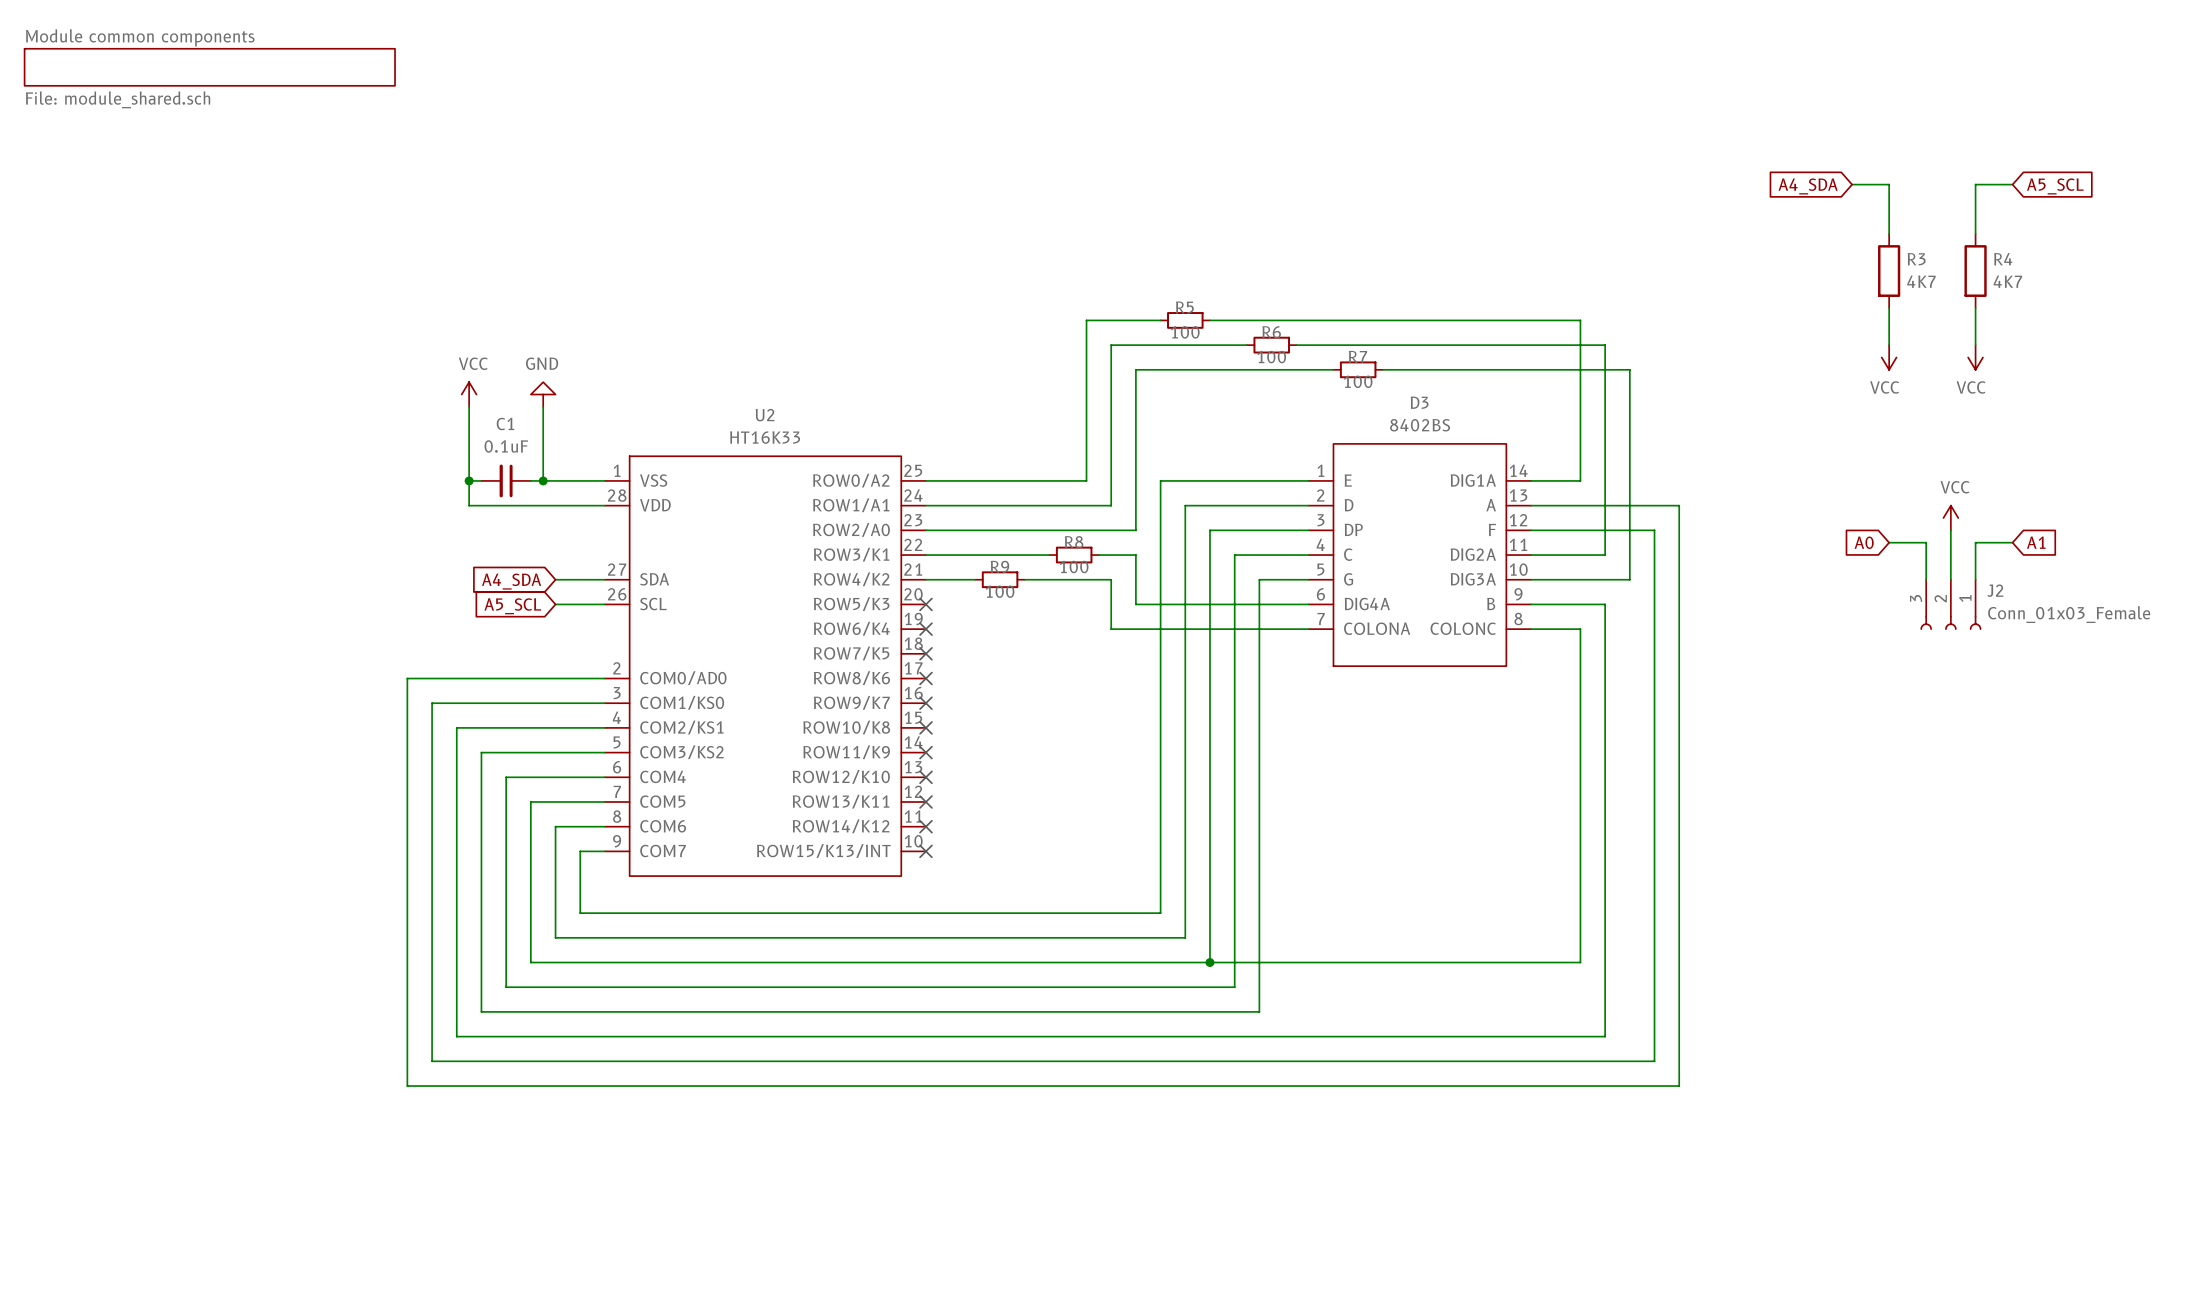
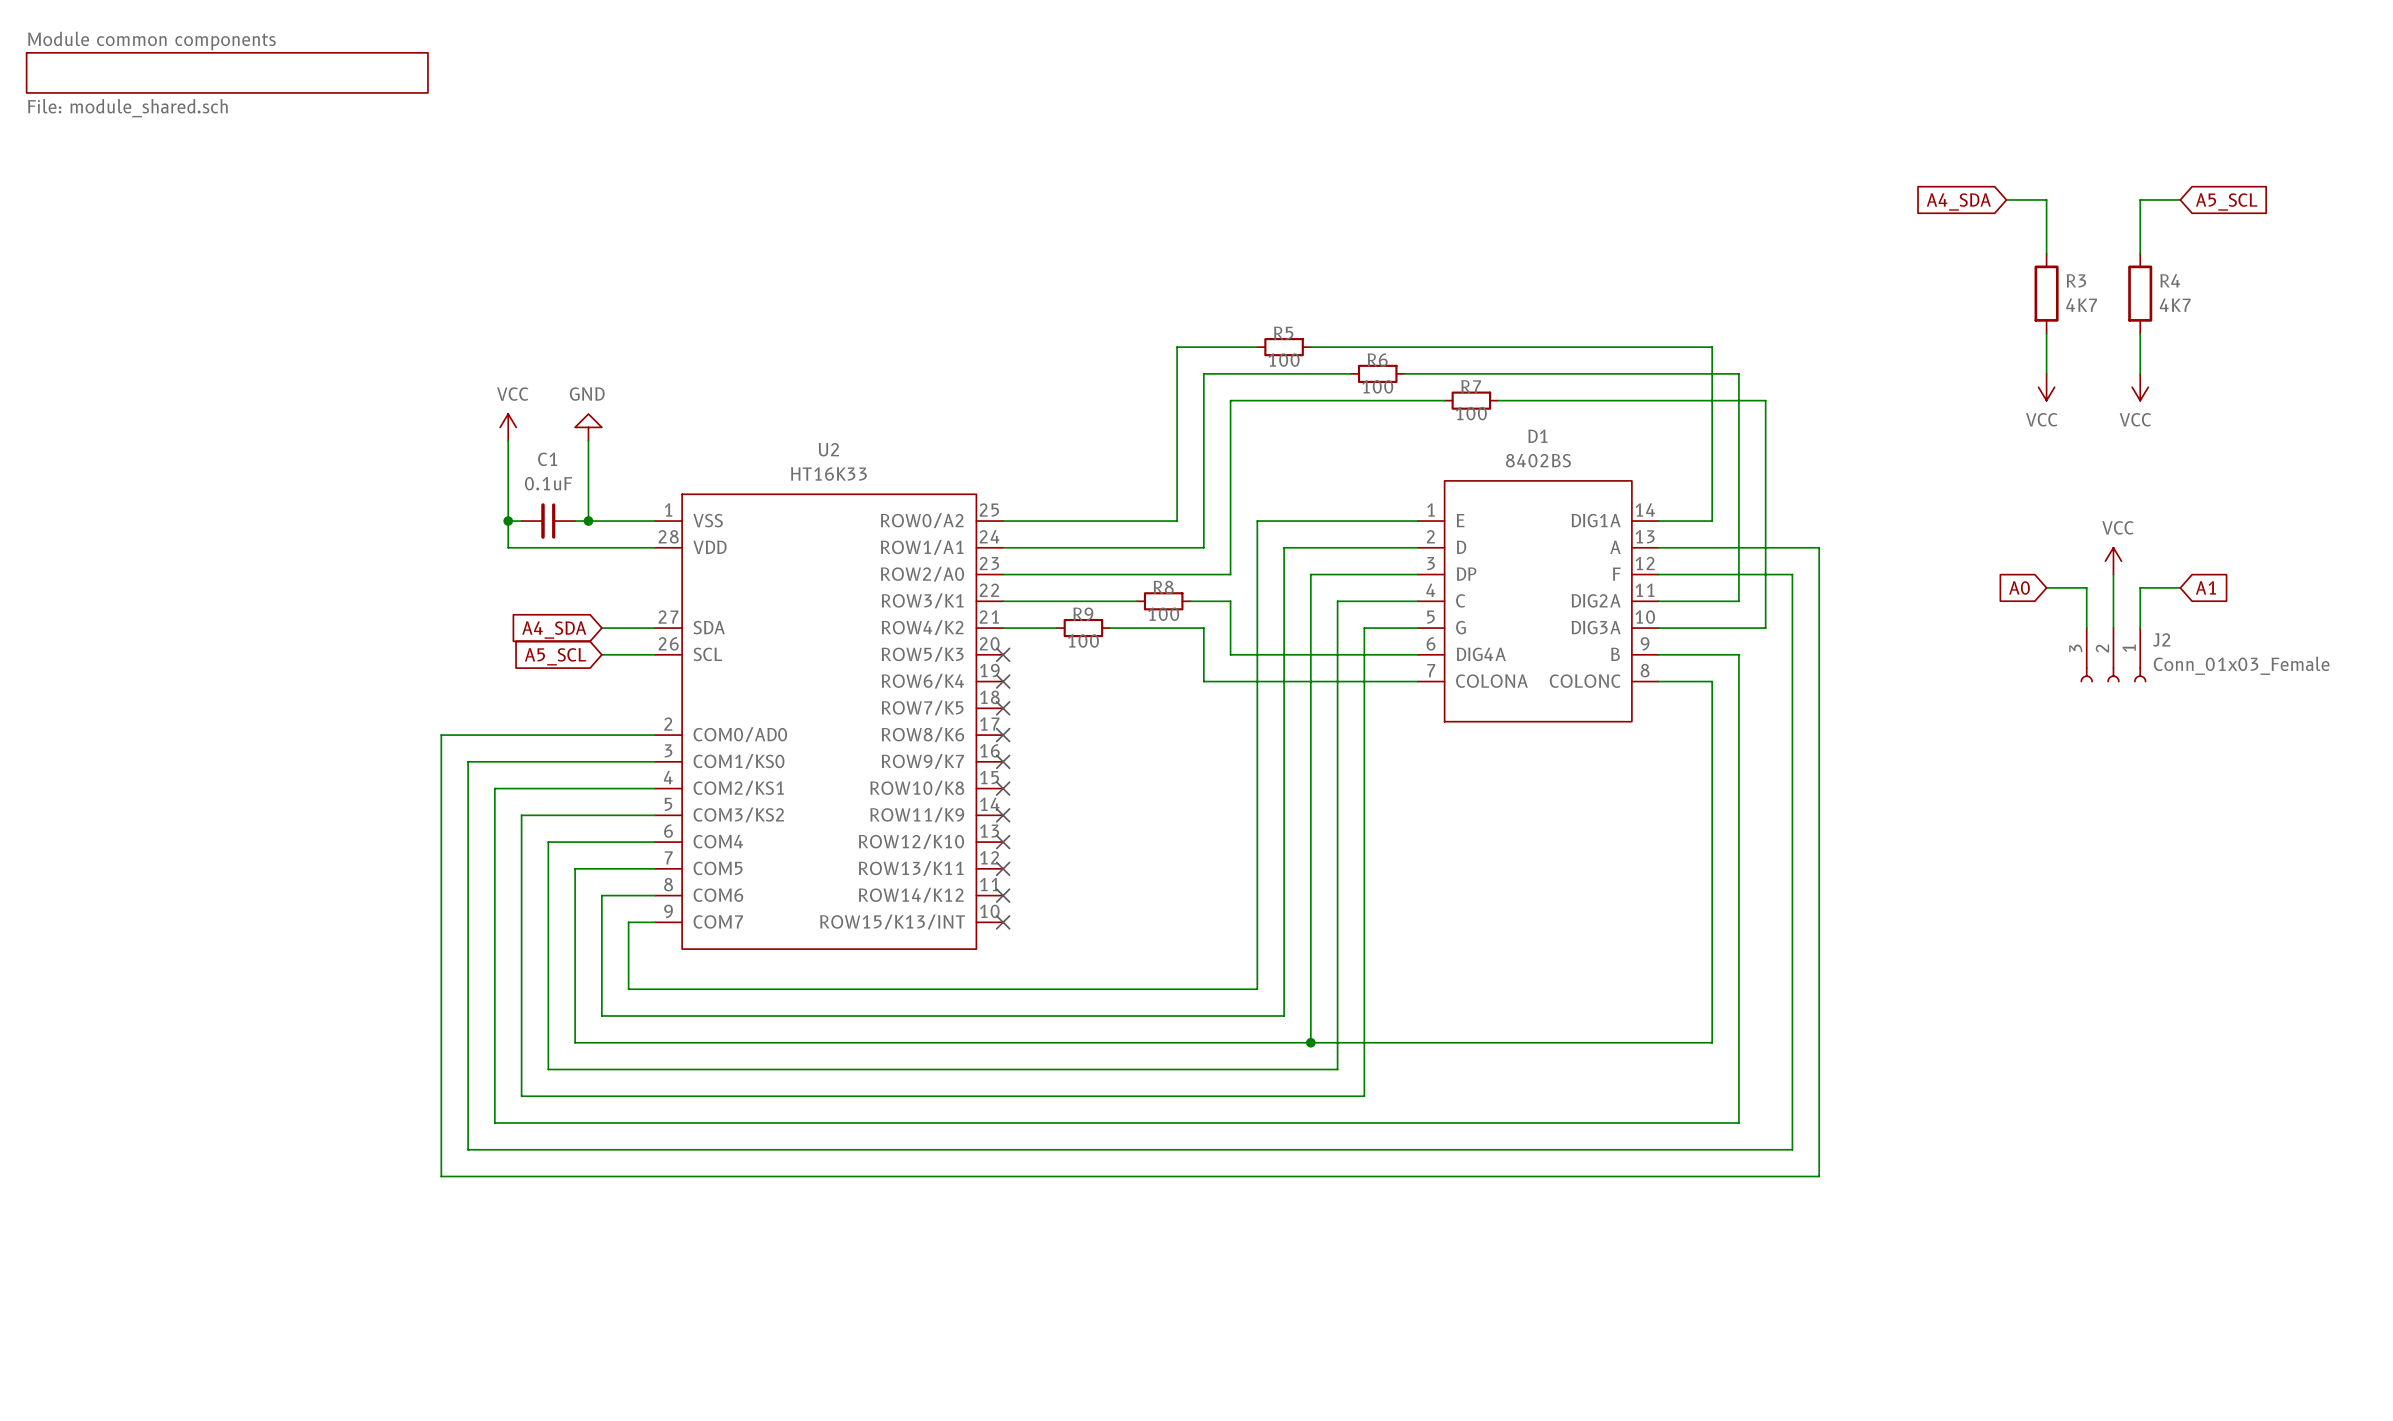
D3 name: D3 (1419, 402) -> D1 (1537, 436)

